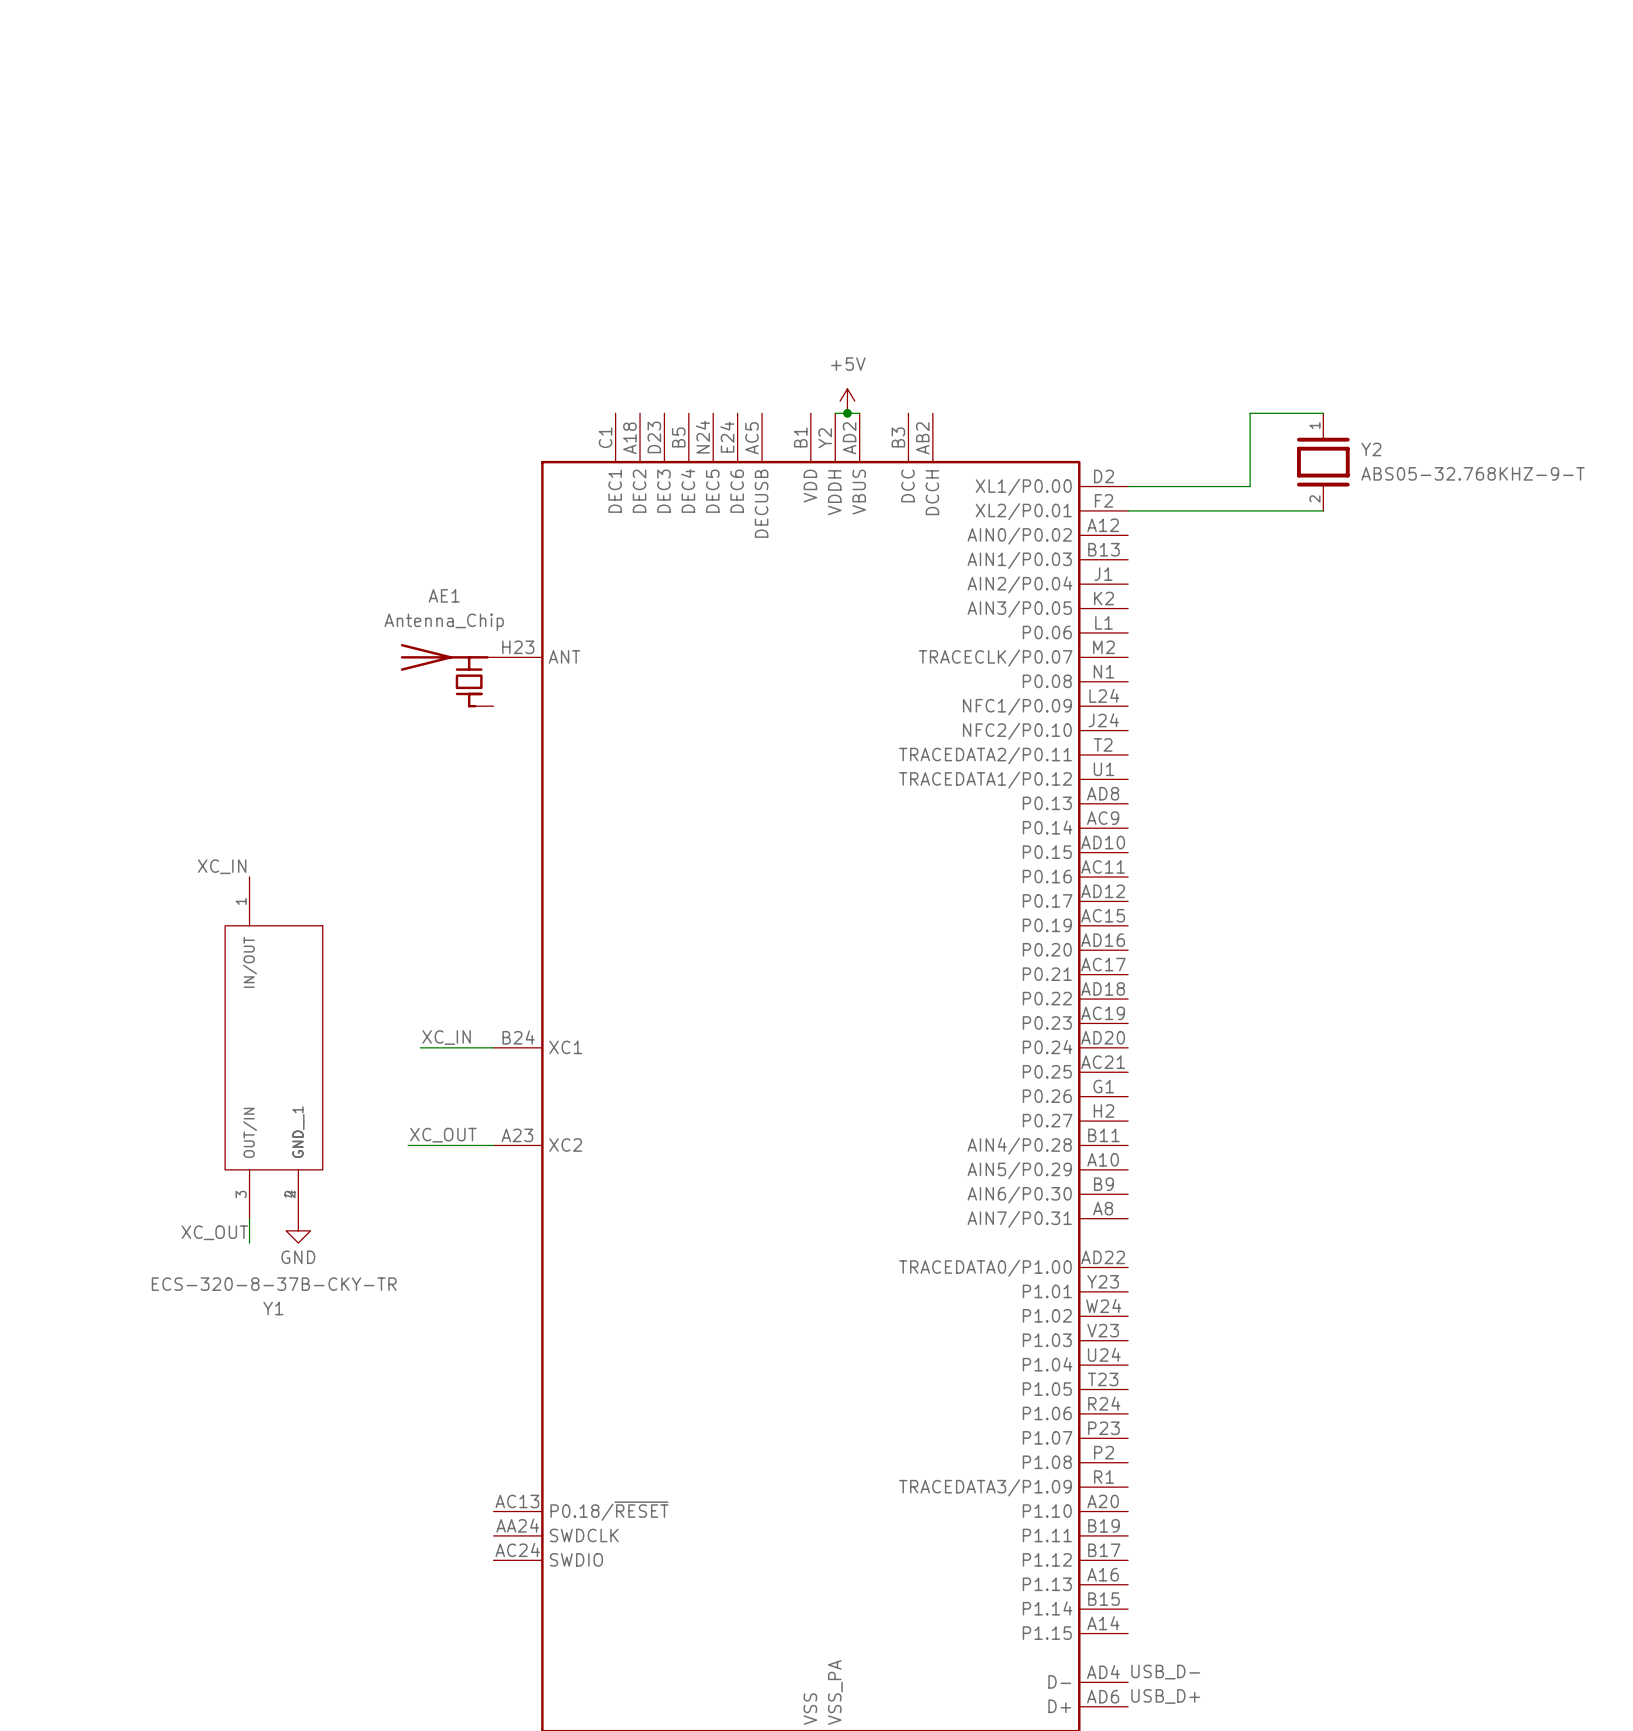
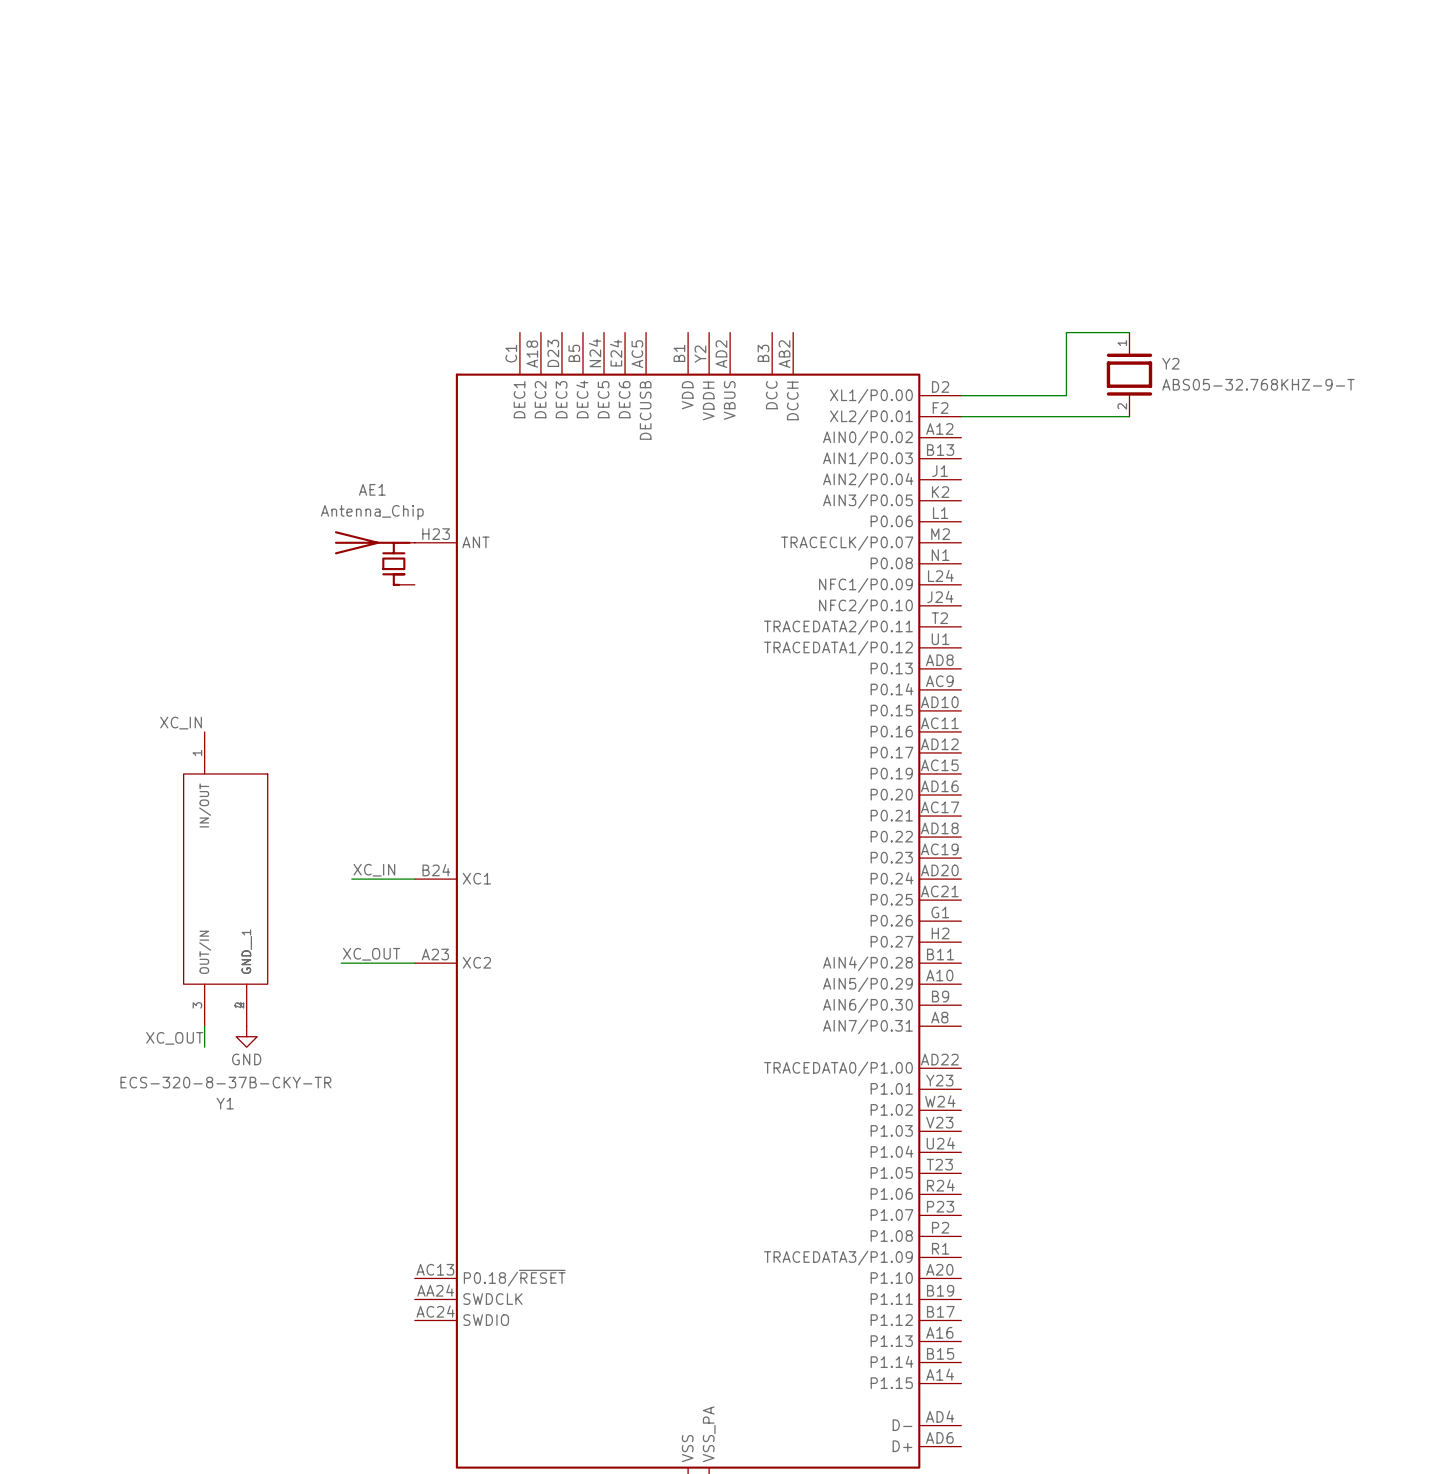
power symbol: +5V (847, 401) -> none
wire: (835, 413) (859, 413) -> none
junction: (847, 413) -> none
label: USB_D- (1165, 1672) -> none
label: USB_D+ (1165, 1696) -> none

